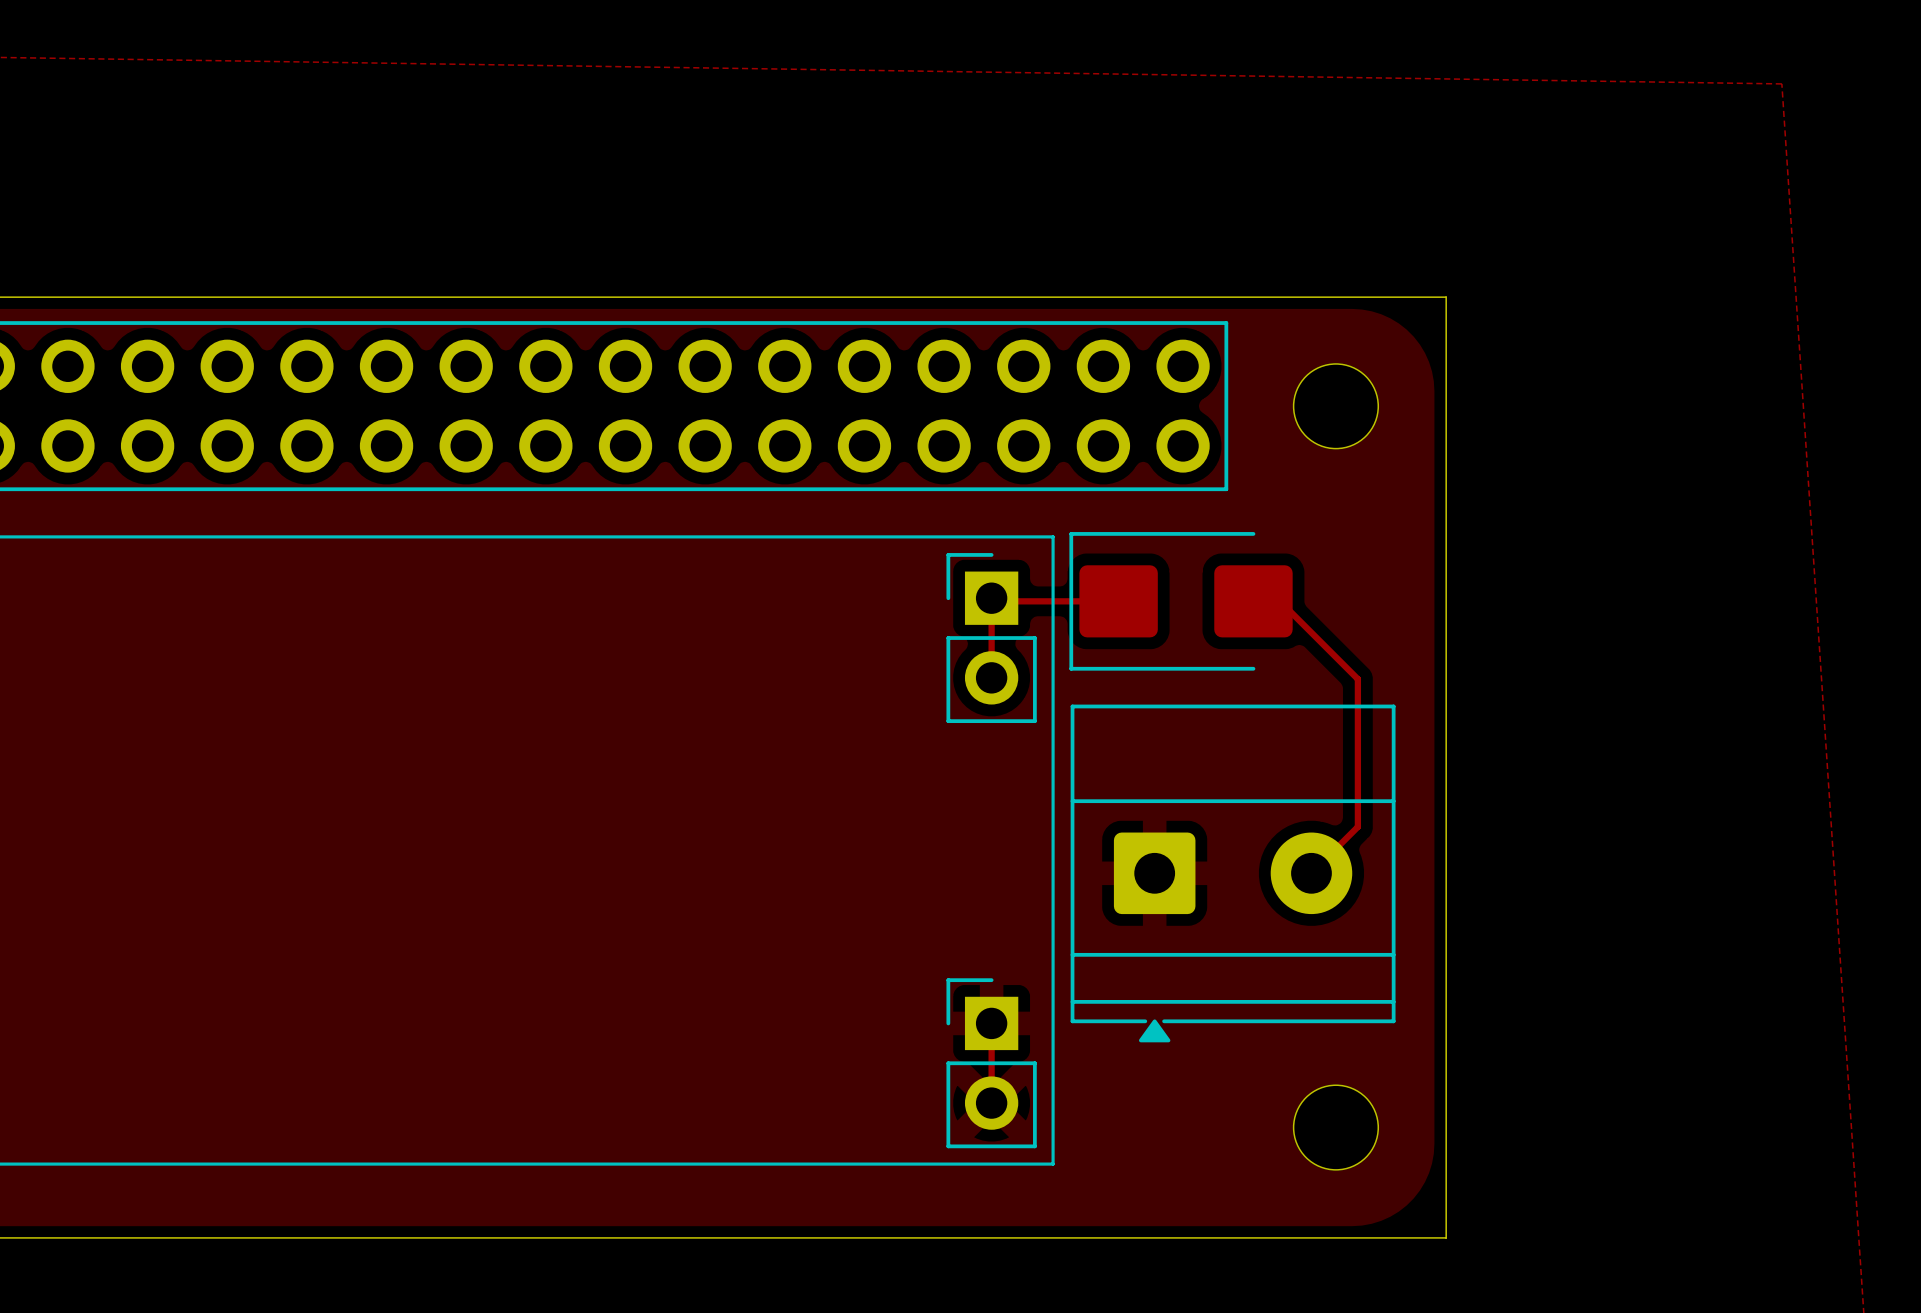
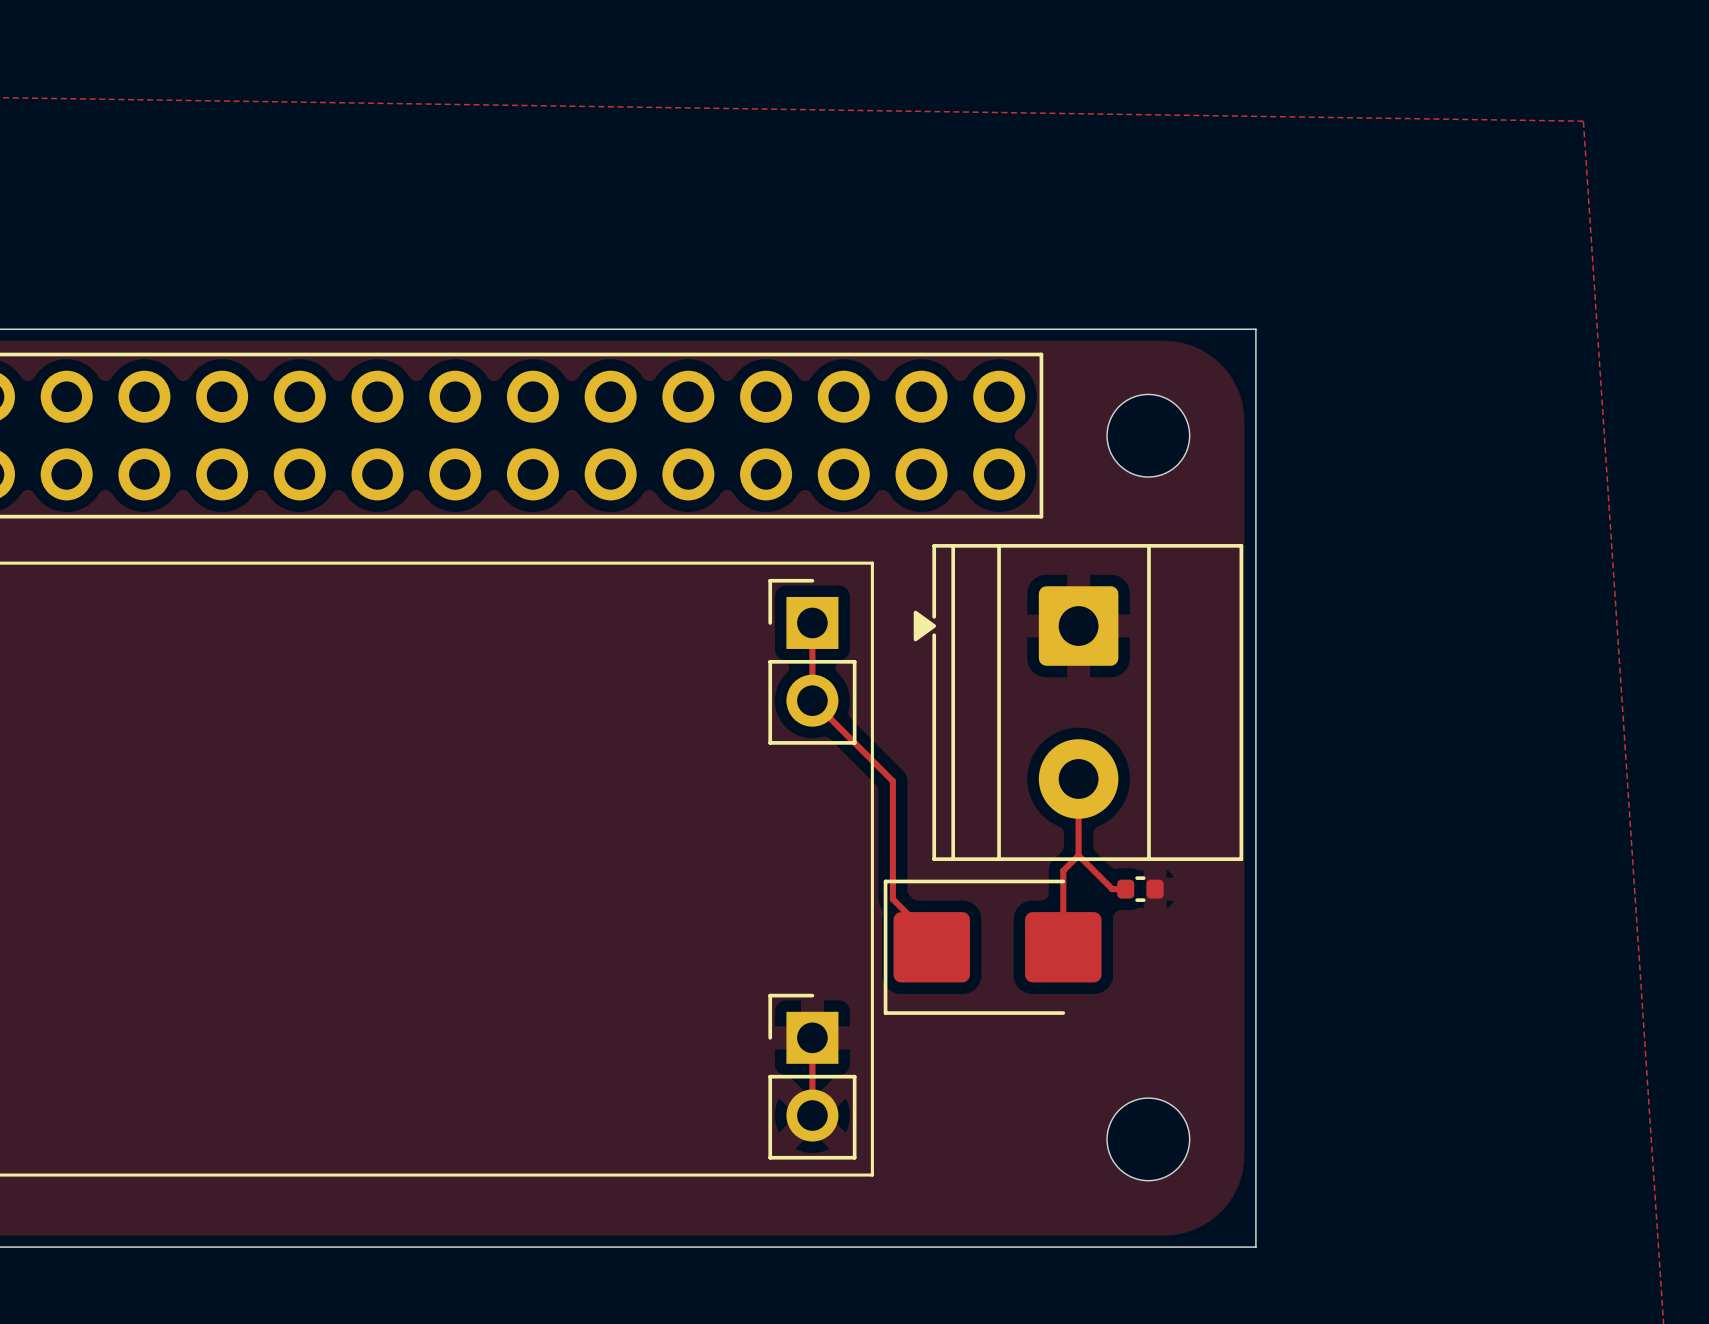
track: (991, 598) (994, 601) (1118, 601) -> none
part position: (1181, 601) -> (992, 947)
track: (1253, 601) (1280, 601) (1357, 679) (1357, 826) (1311, 873) -> none
track: none -> (812, 700) (892, 781) (892, 899) (931, 938) (931, 947)
track: none -> (1078, 778) (1078, 855)
track: none -> (1078, 855) (1112, 889) (1125, 889)
track: none -> (1078, 855) (1063, 870) (1063, 947)
part: none -> (1140, 889)
part rotation: 0° (1233, 873) -> 90° clockwise (1078, 702)

